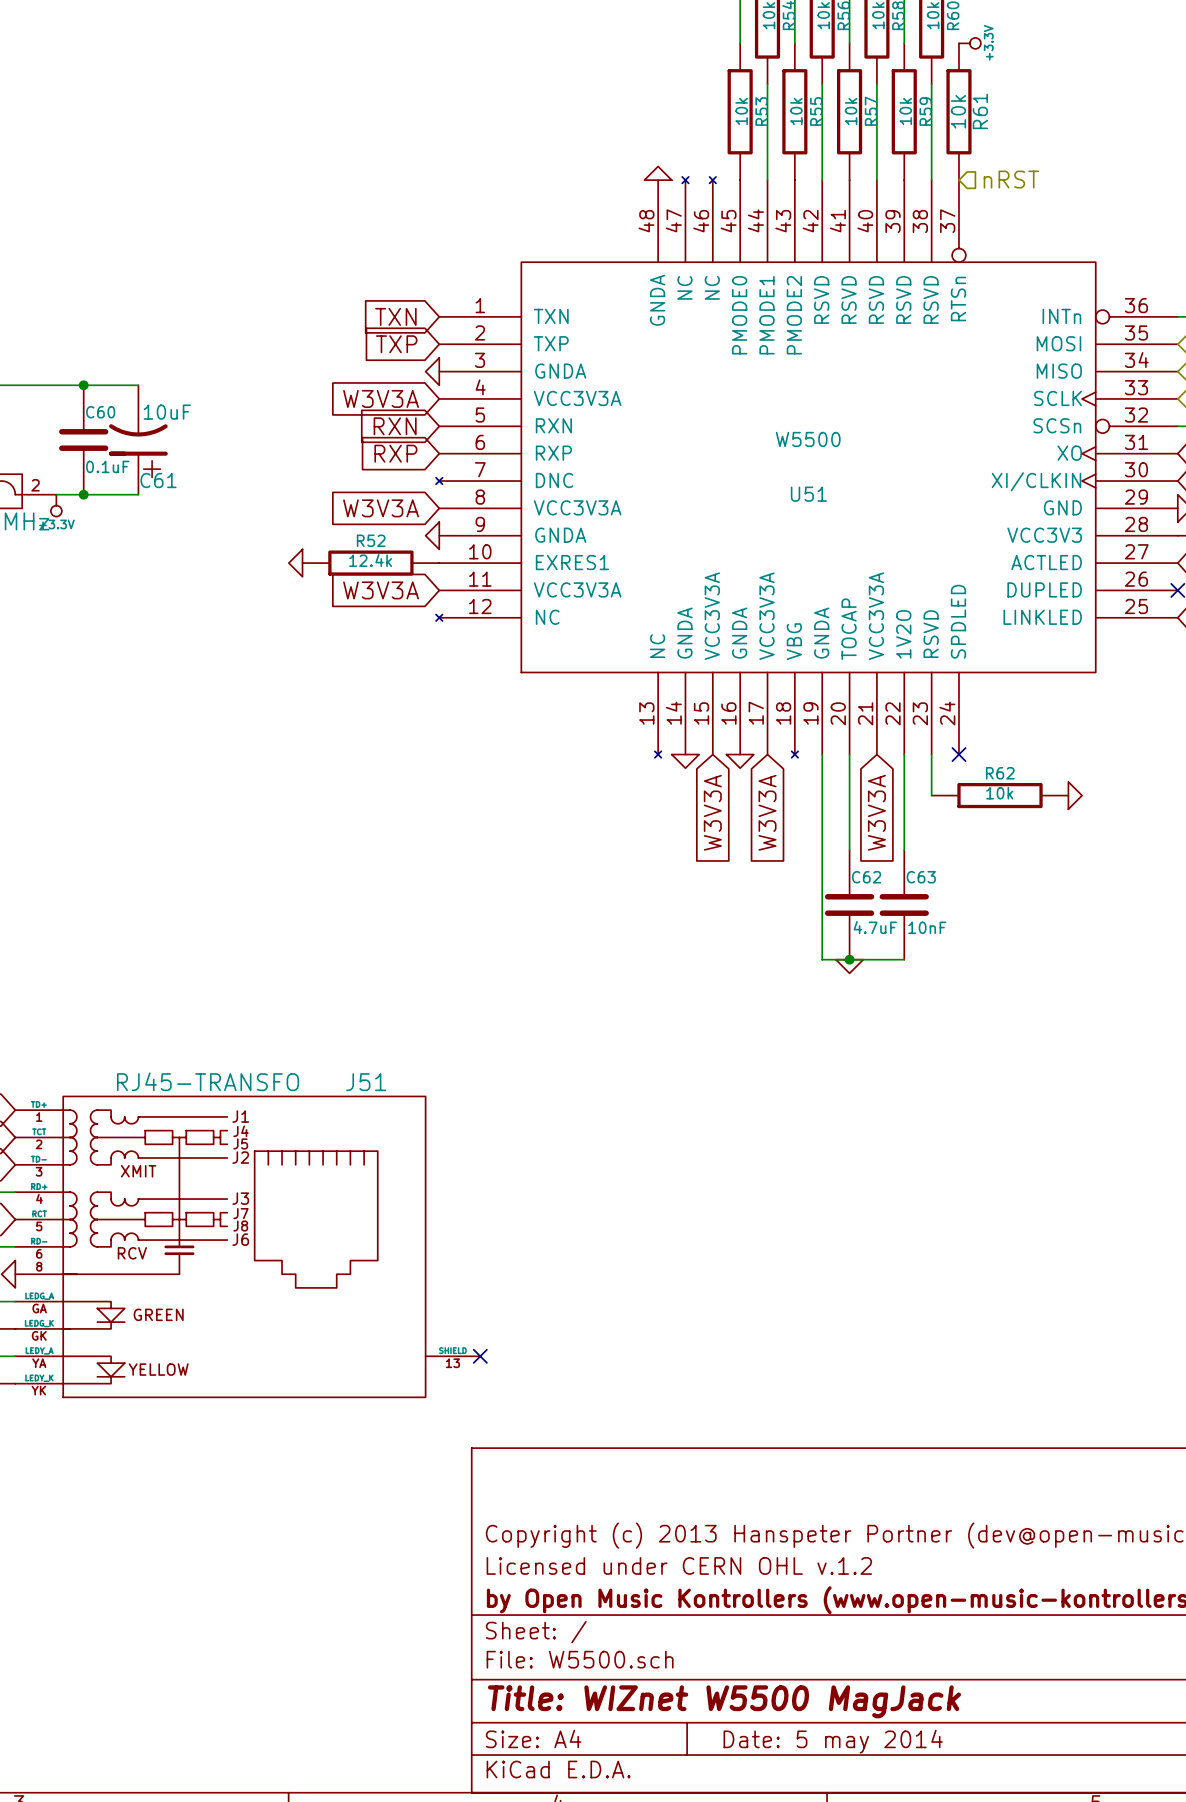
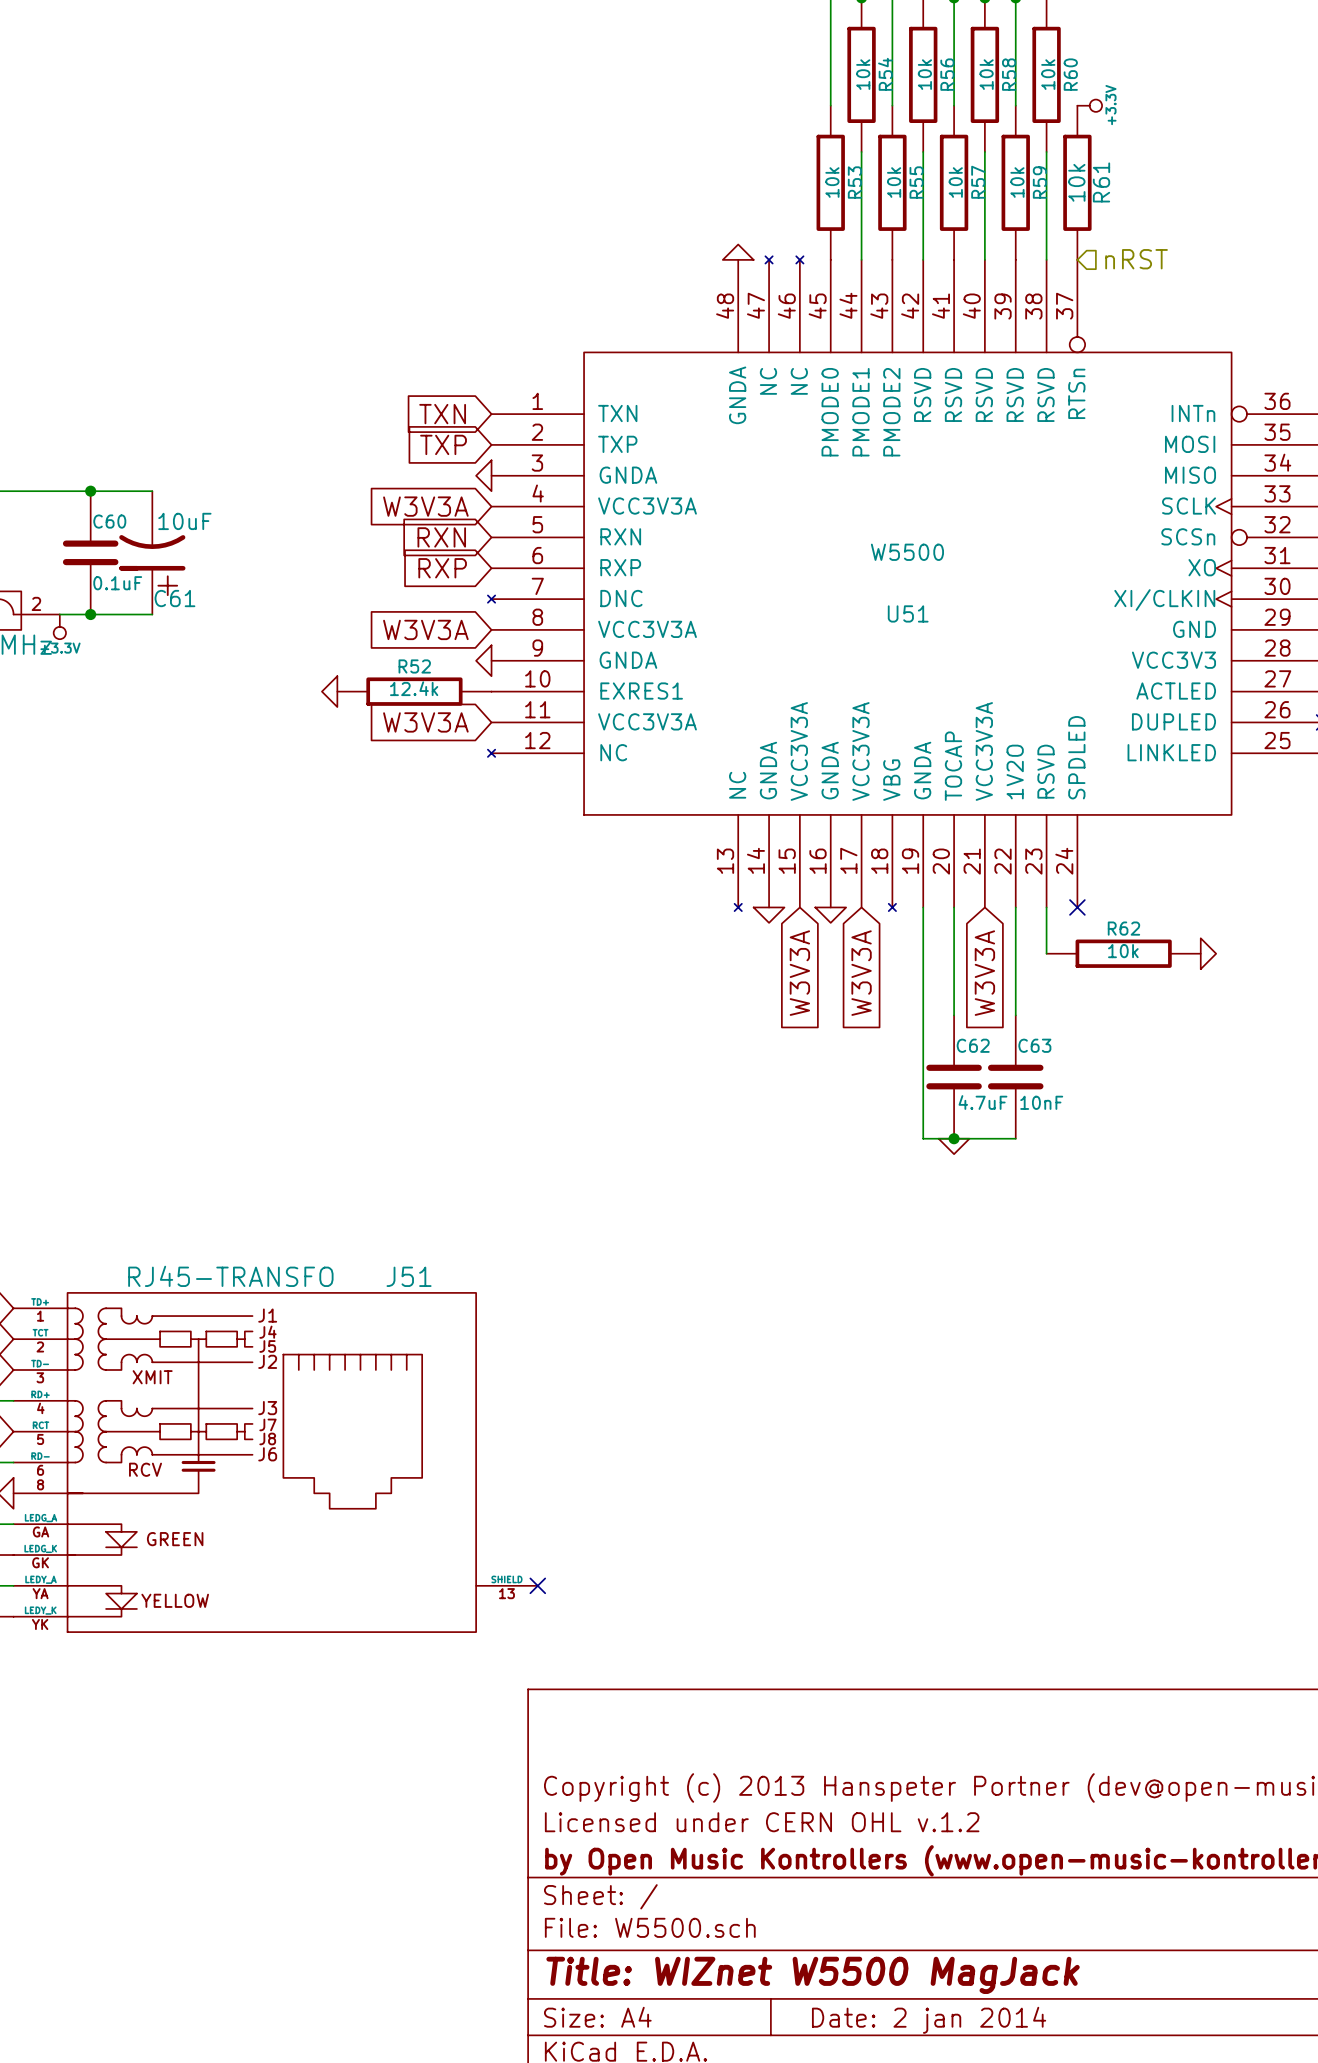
title block: Date: 5 may 2014 (833, 1741) -> Date: 2 jan 2014 (929, 2020)

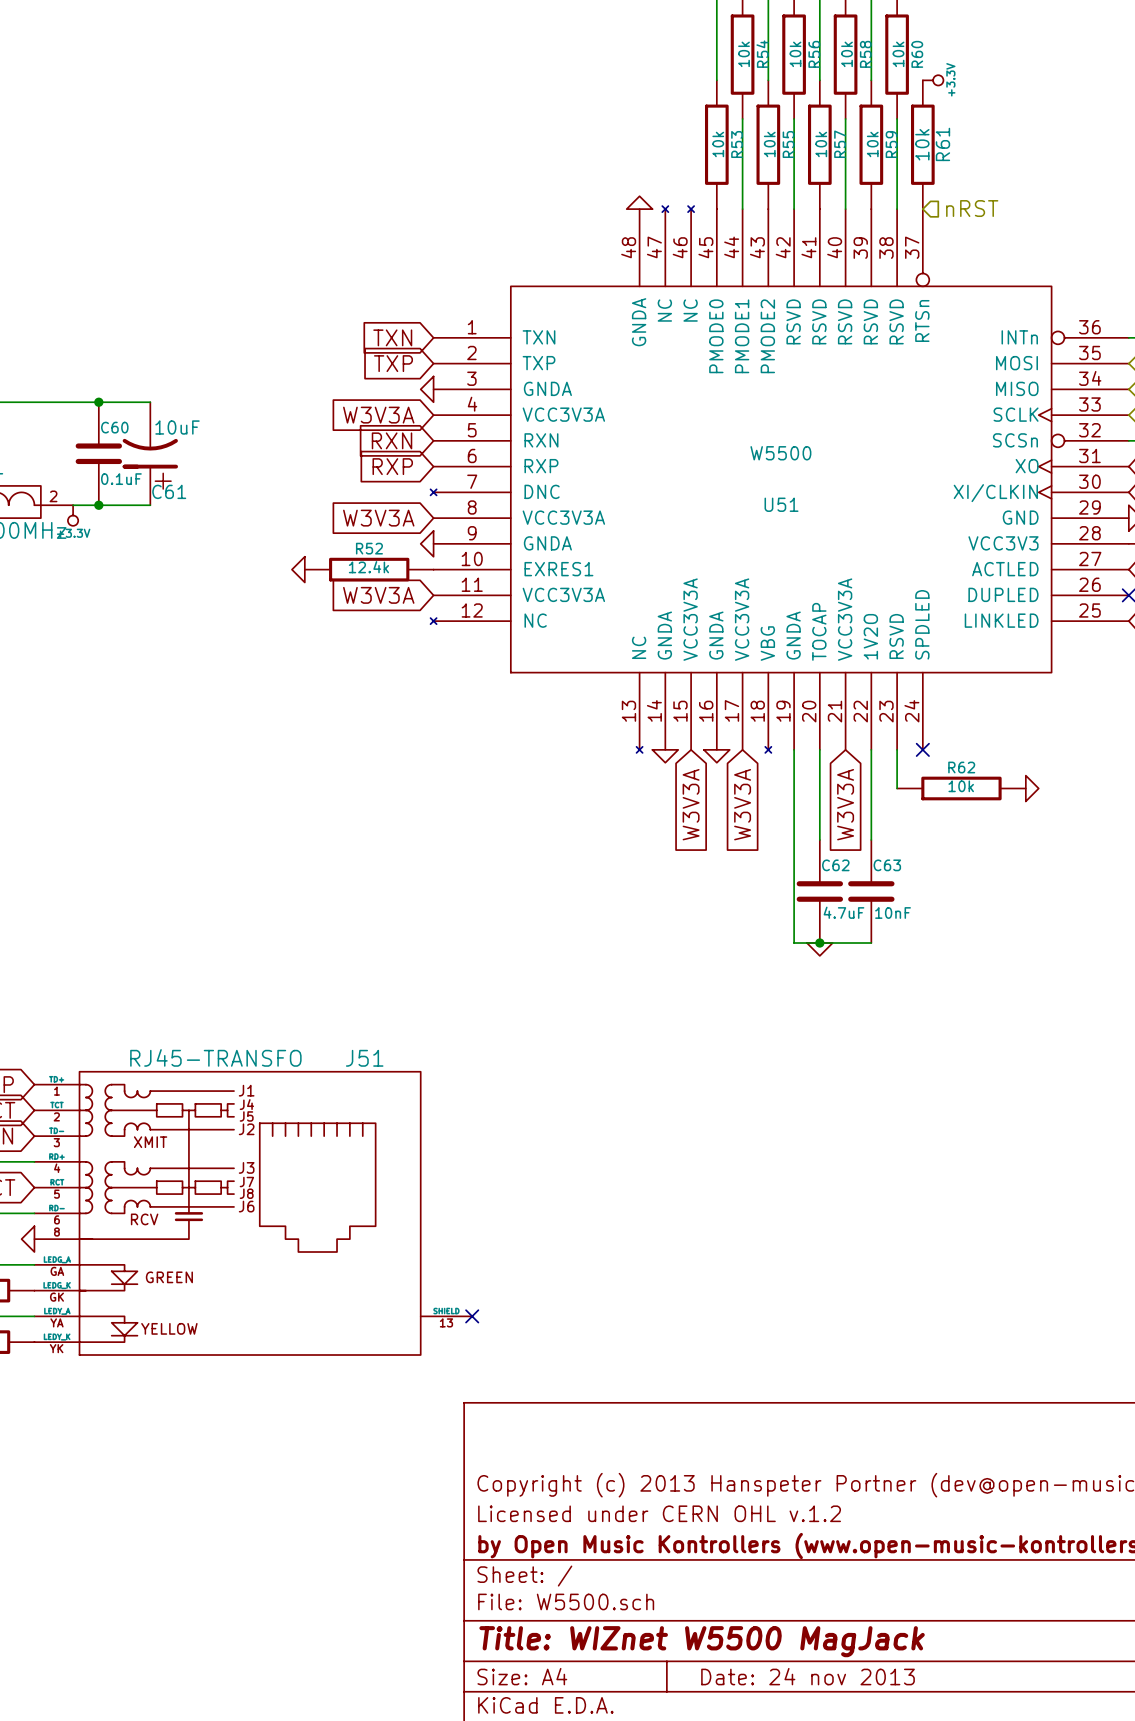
title block: Date: 2 jan 2014 (929, 2020) -> Date: 24 nov 2013 (808, 1676)

